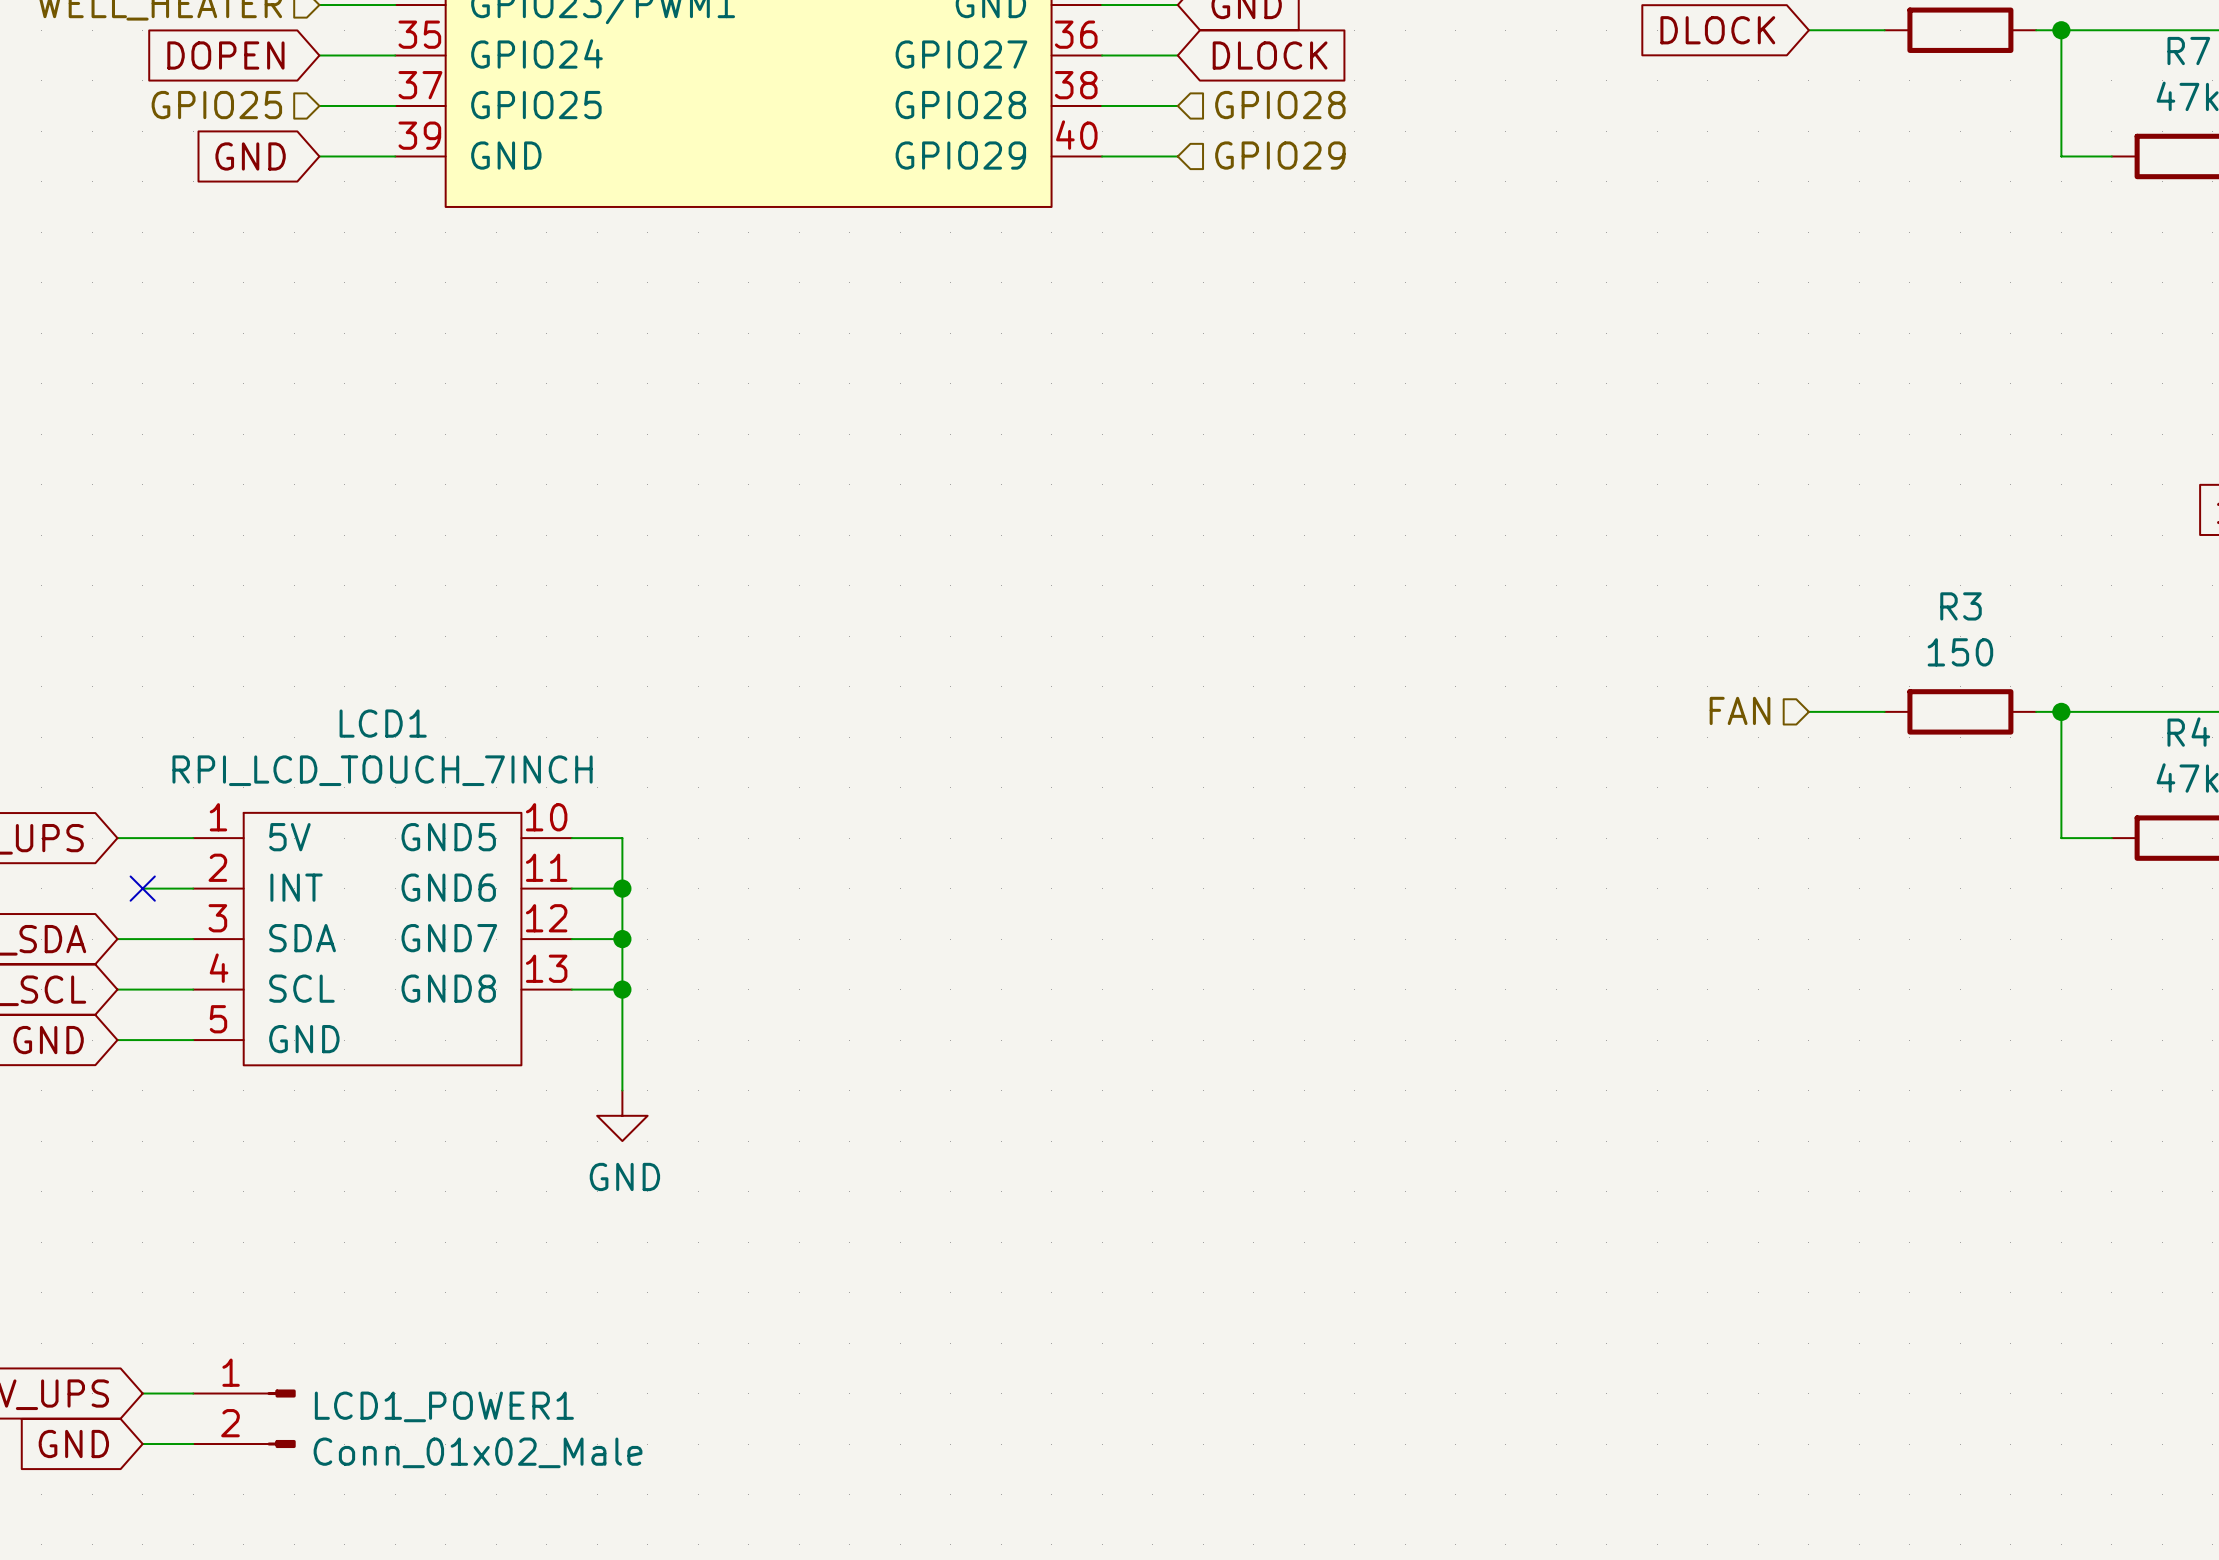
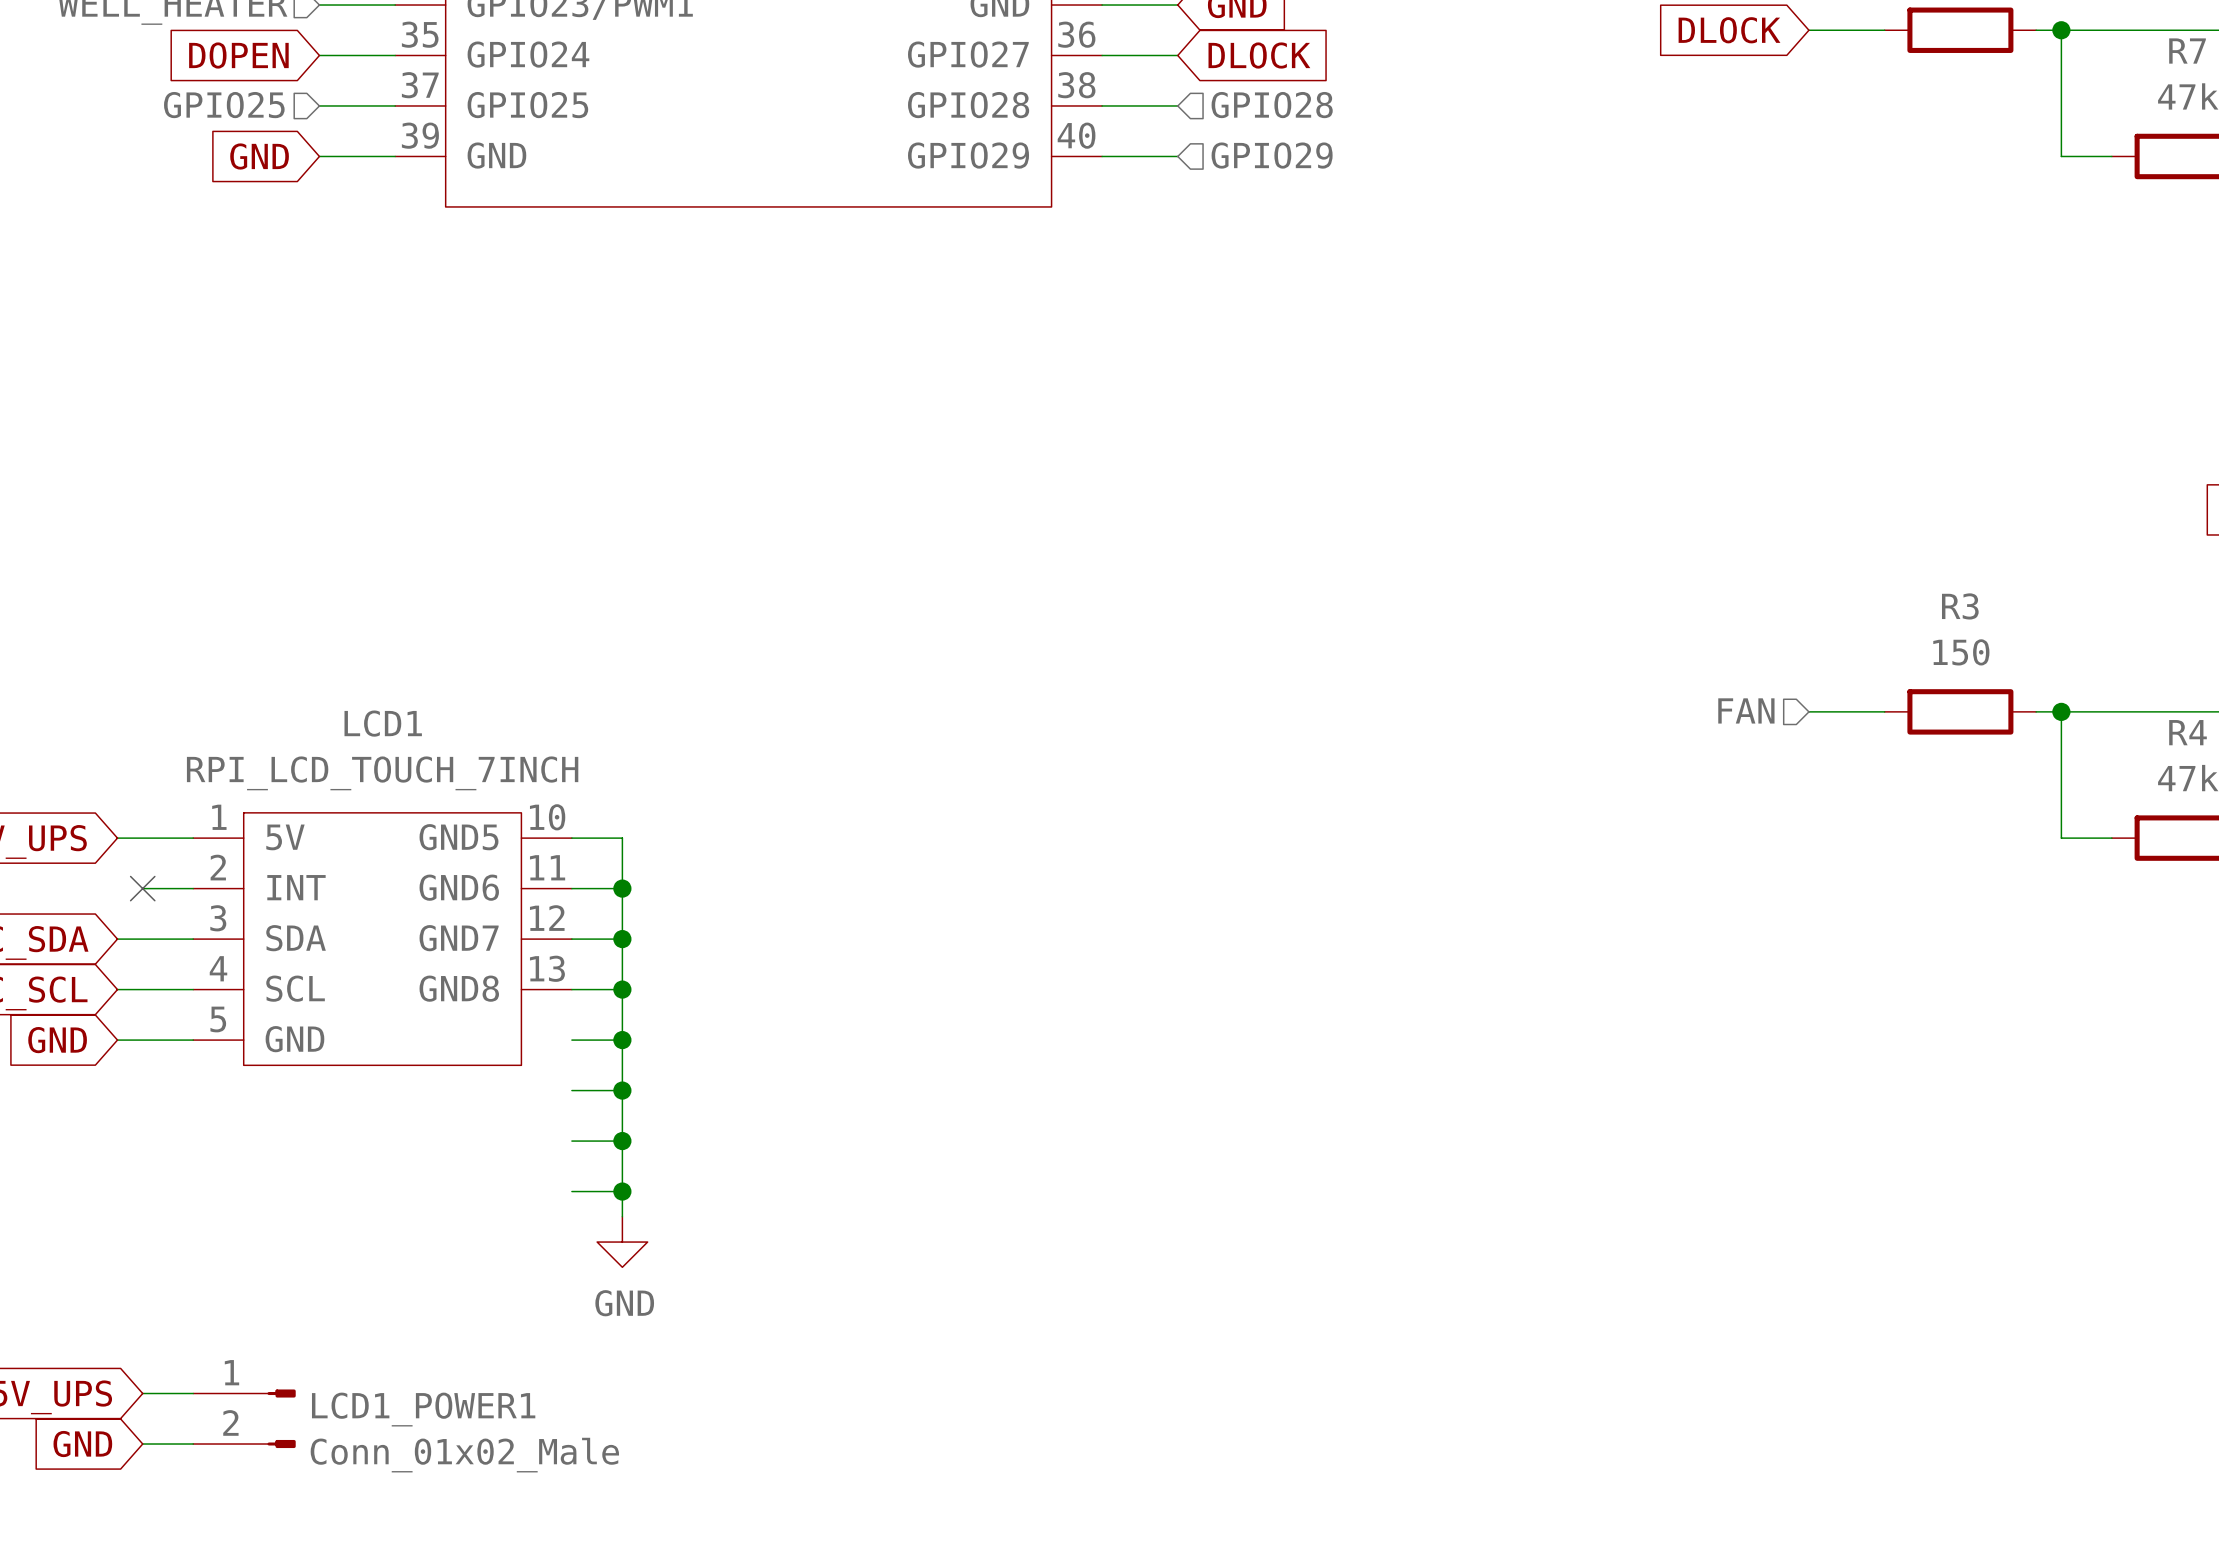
wire: none -> (571, 1040) (622, 1040)
junction: none -> (622, 1040)
wire: none -> (571, 1090) (622, 1090) (622, 1216)
junction: none -> (622, 1090)
power symbol position: GND (622, 1115) -> GND (622, 1242)
wire: none -> (571, 1141) (622, 1141)
junction: none -> (622, 1141)
wire: none -> (571, 1191) (622, 1191)
junction: none -> (622, 1191)

